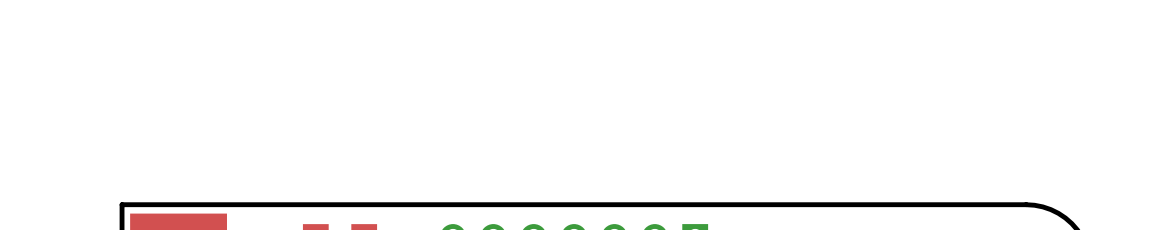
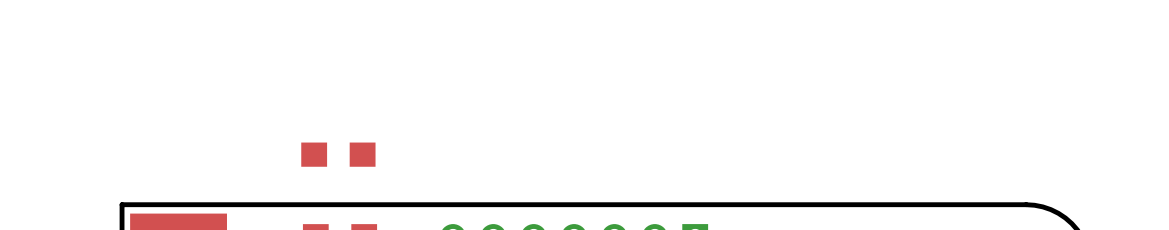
part: none -> (338, 154)

